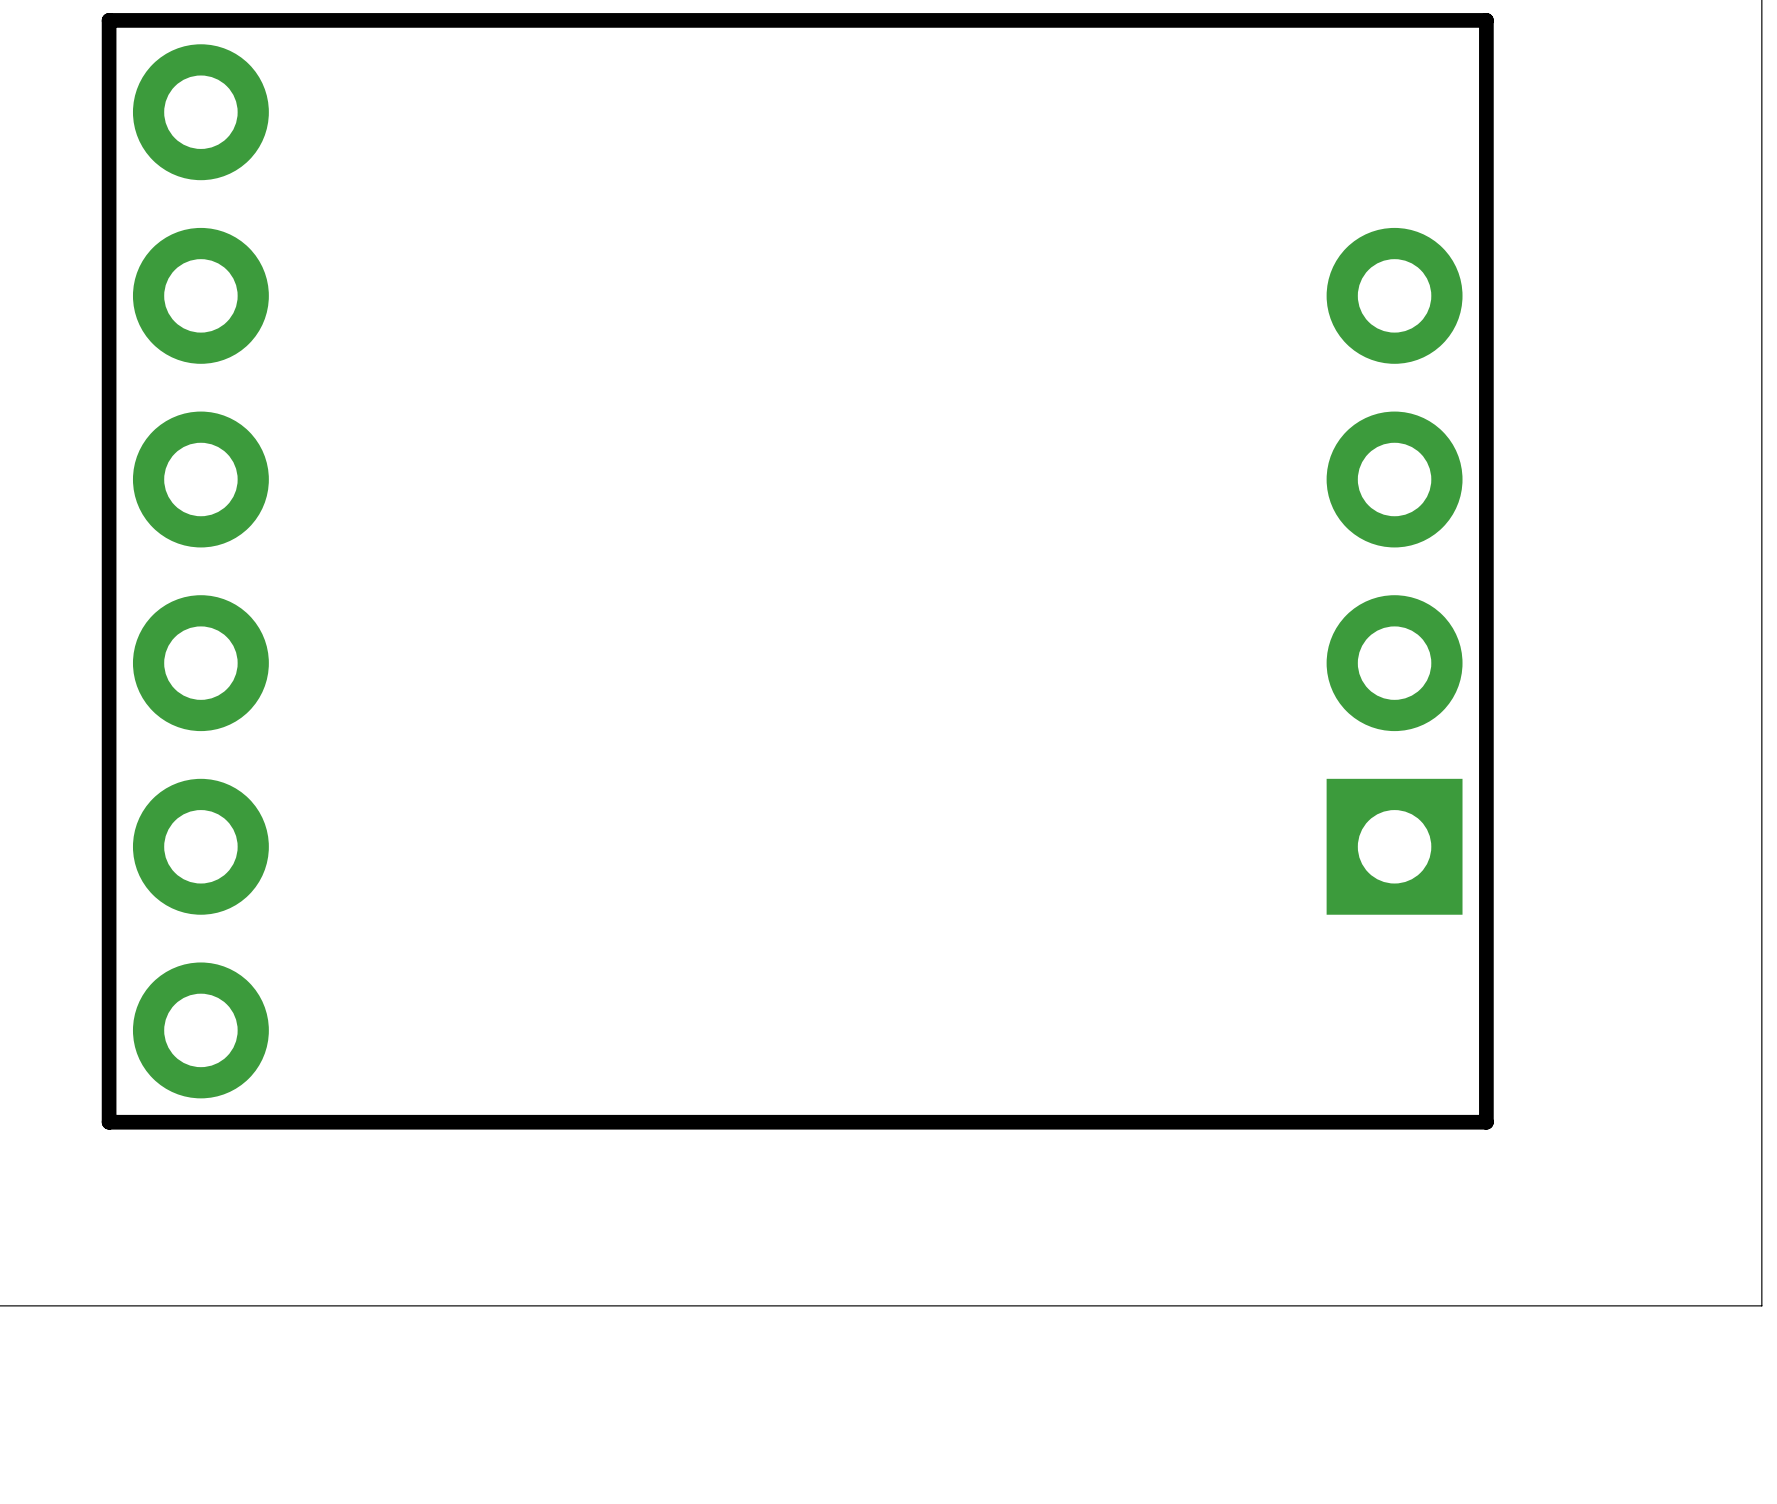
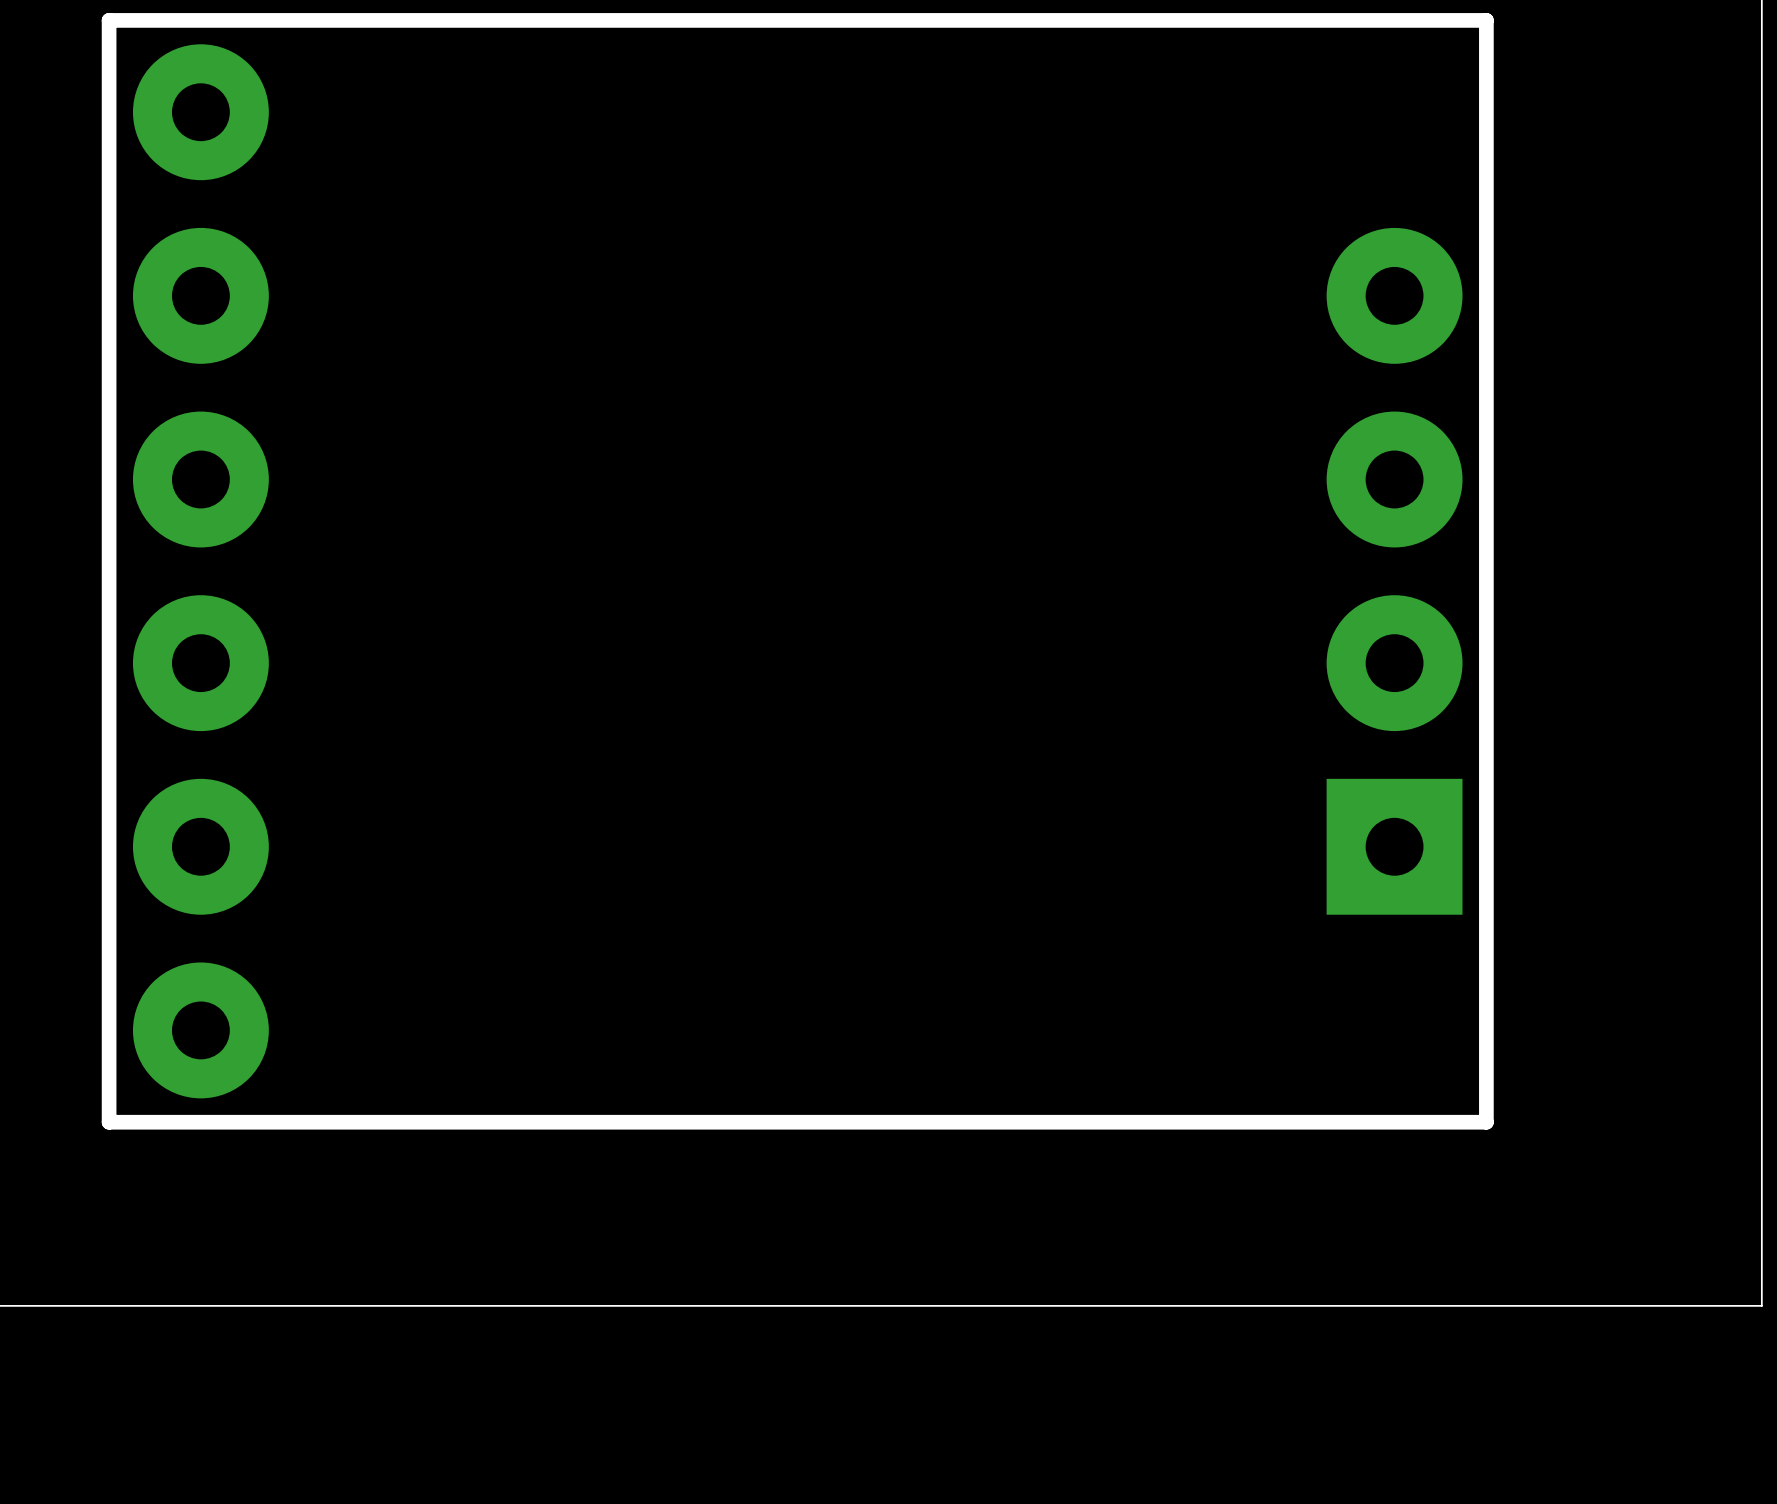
part footprint: [101, 13, 1494, 1130] -> [101, 13, 1494, 1130]

